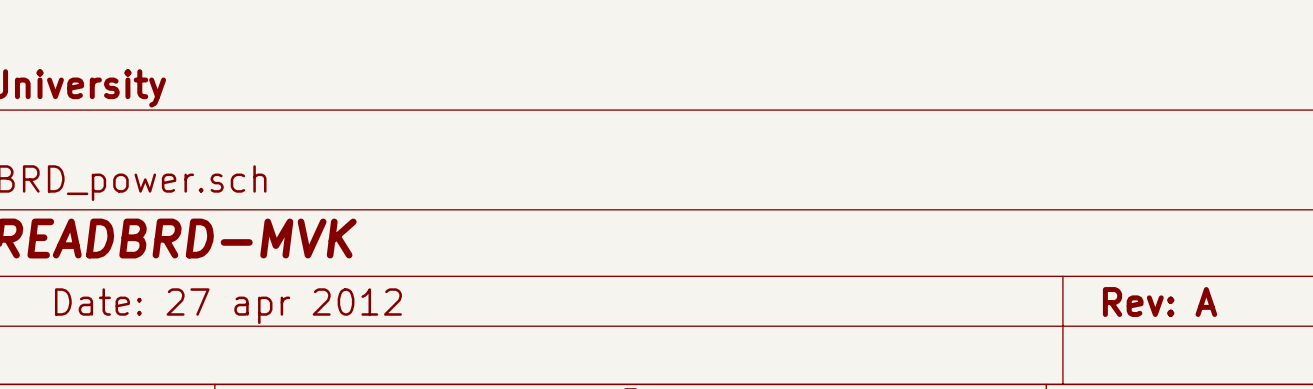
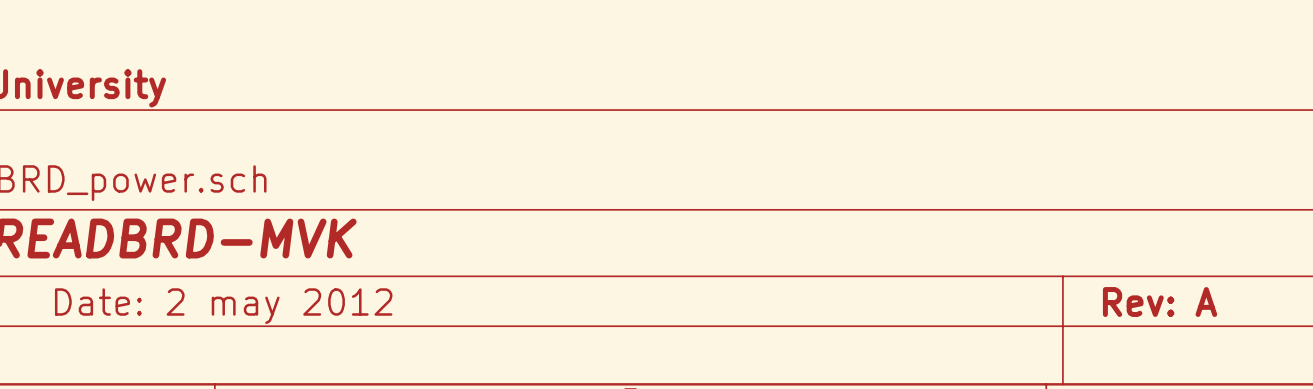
title block: Date: 27 apr 2012 (228, 306) -> Date: 2 may 2012 (223, 306)

